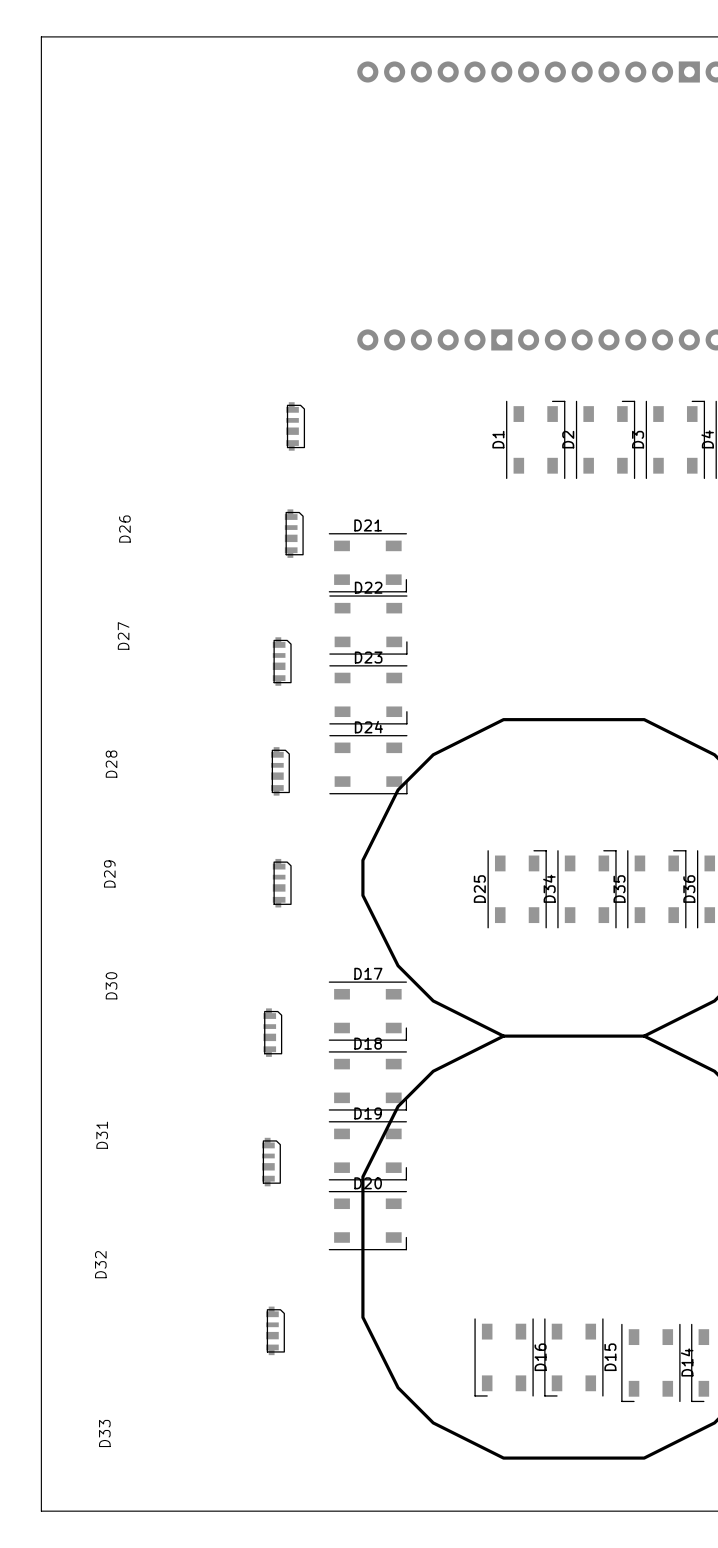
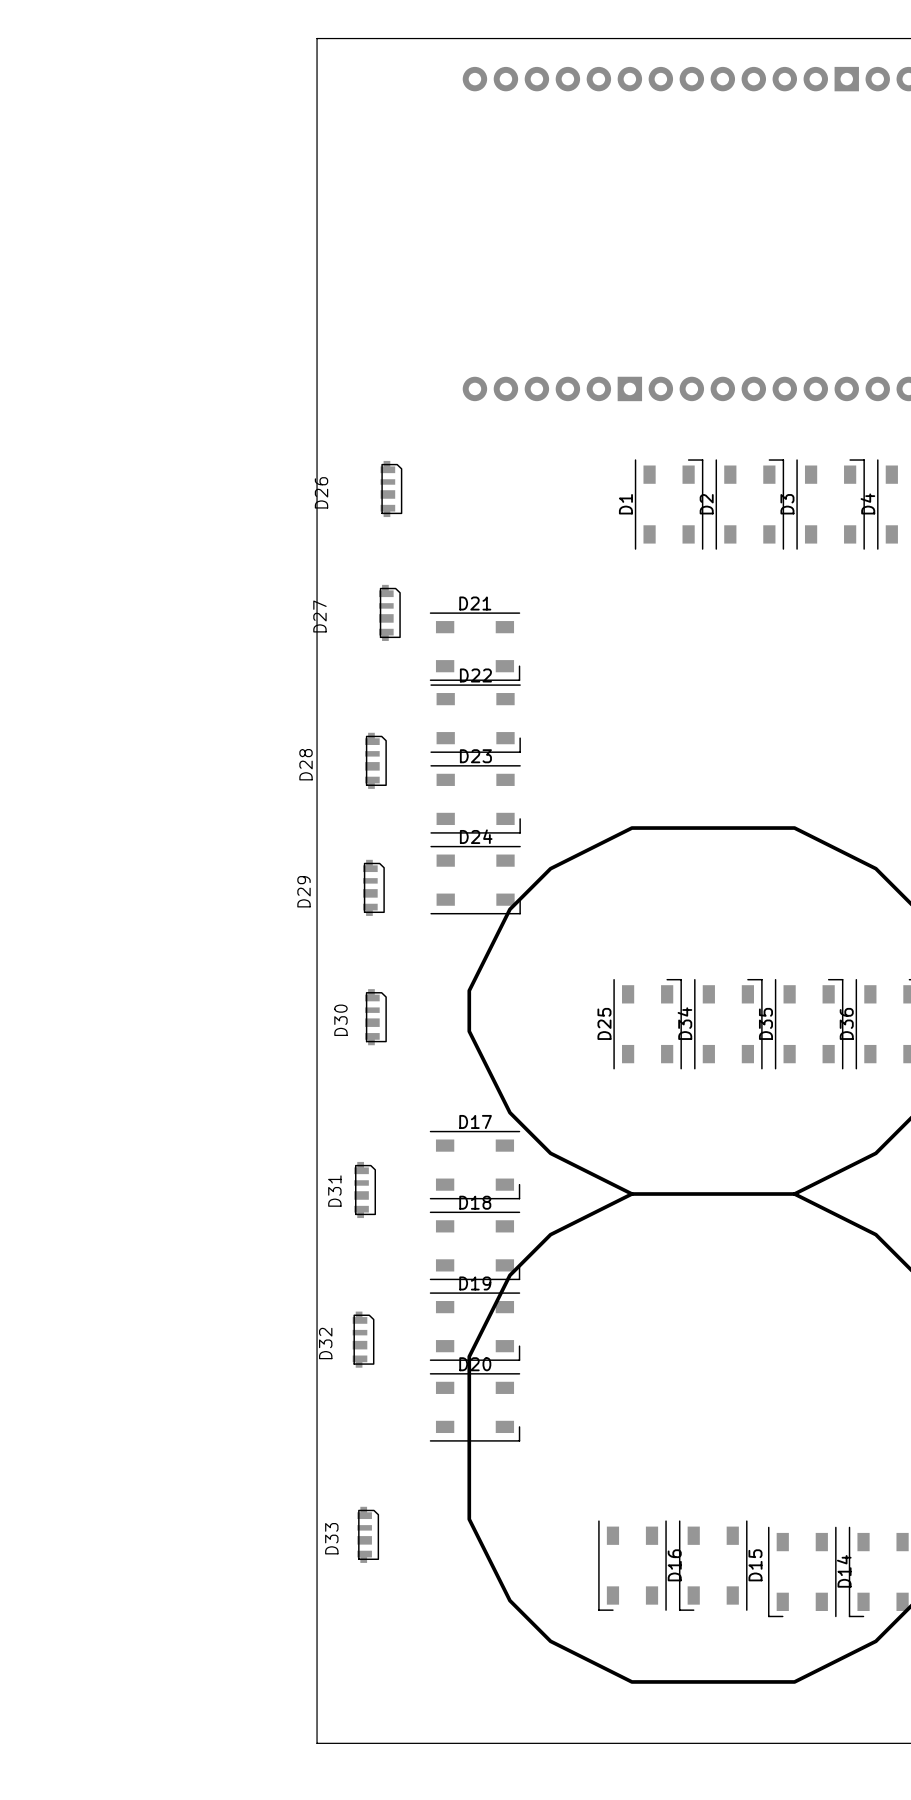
board edge: (231, 36) (41, 36) (41, 1511) (231, 1511) -> (317, 38) (317, 1743)
D26 name position: D26 (124, 529) -> D26 (321, 492)
D27 name position: D27 (123, 635) -> D27 (319, 616)
D28 name position: D28 (111, 764) -> D28 (306, 764)
D29 name position: D29 (109, 874) -> D29 (303, 891)
D30 name position: D30 (111, 985) -> D30 (340, 1020)
D31 name position: D31 (102, 1135) -> D31 (334, 1191)
D32 name position: D32 (100, 1264) -> D32 (325, 1343)
D33 name position: D33 (104, 1433) -> D33 (331, 1538)

